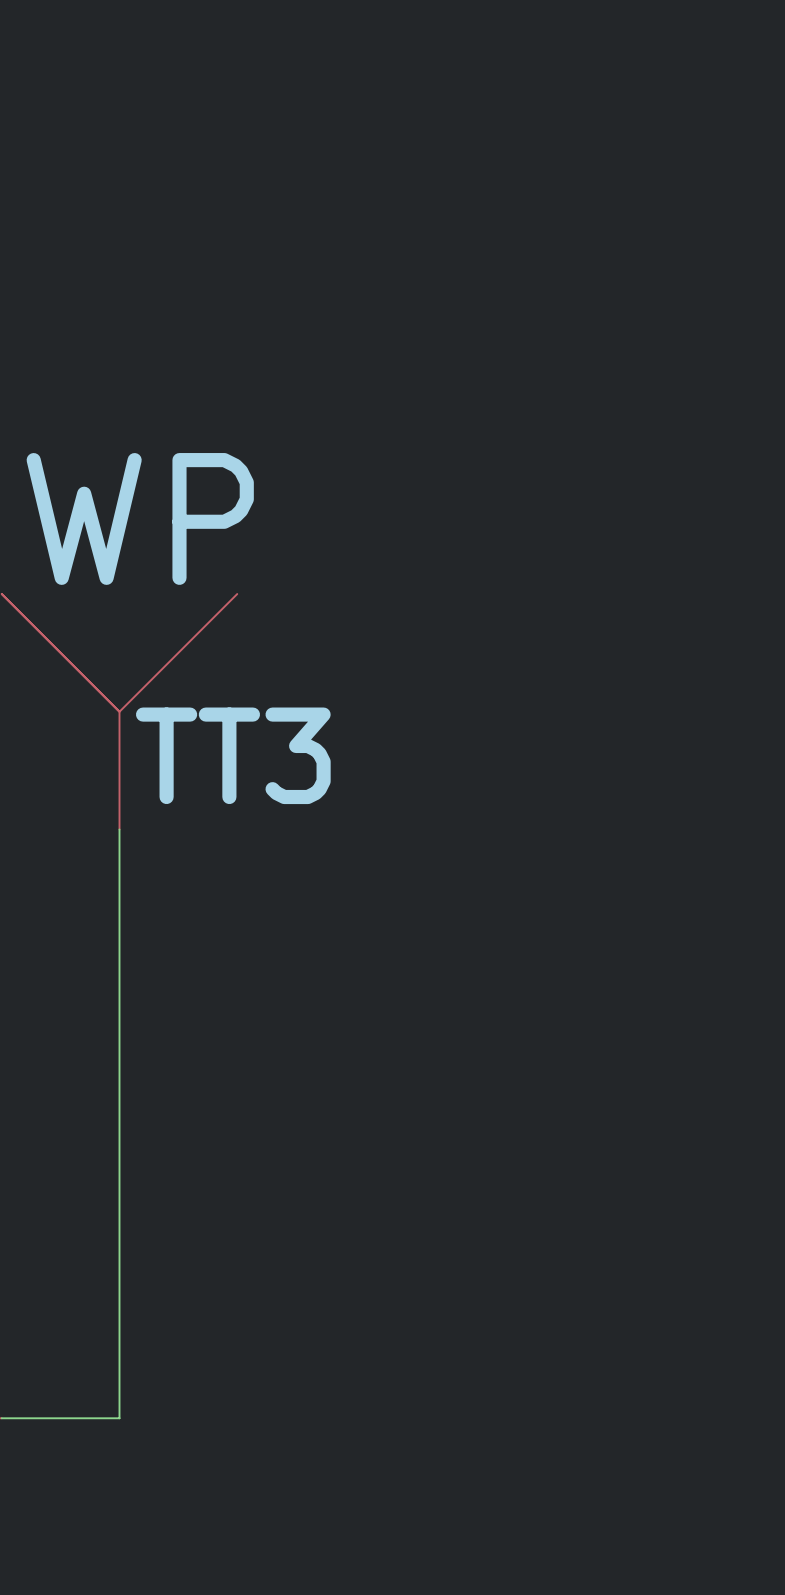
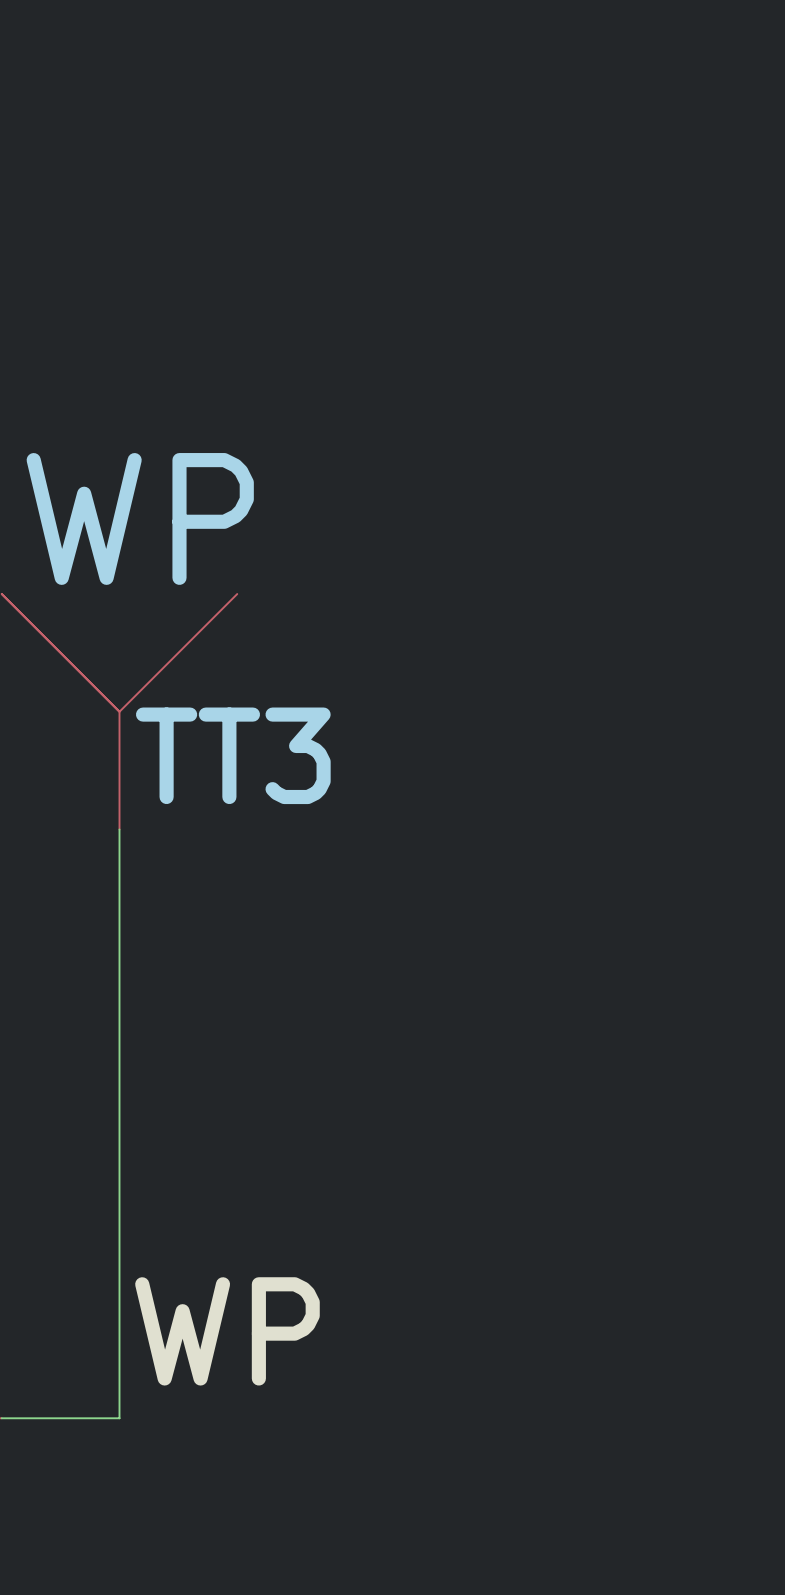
label: none -> WP (227, 1331)

